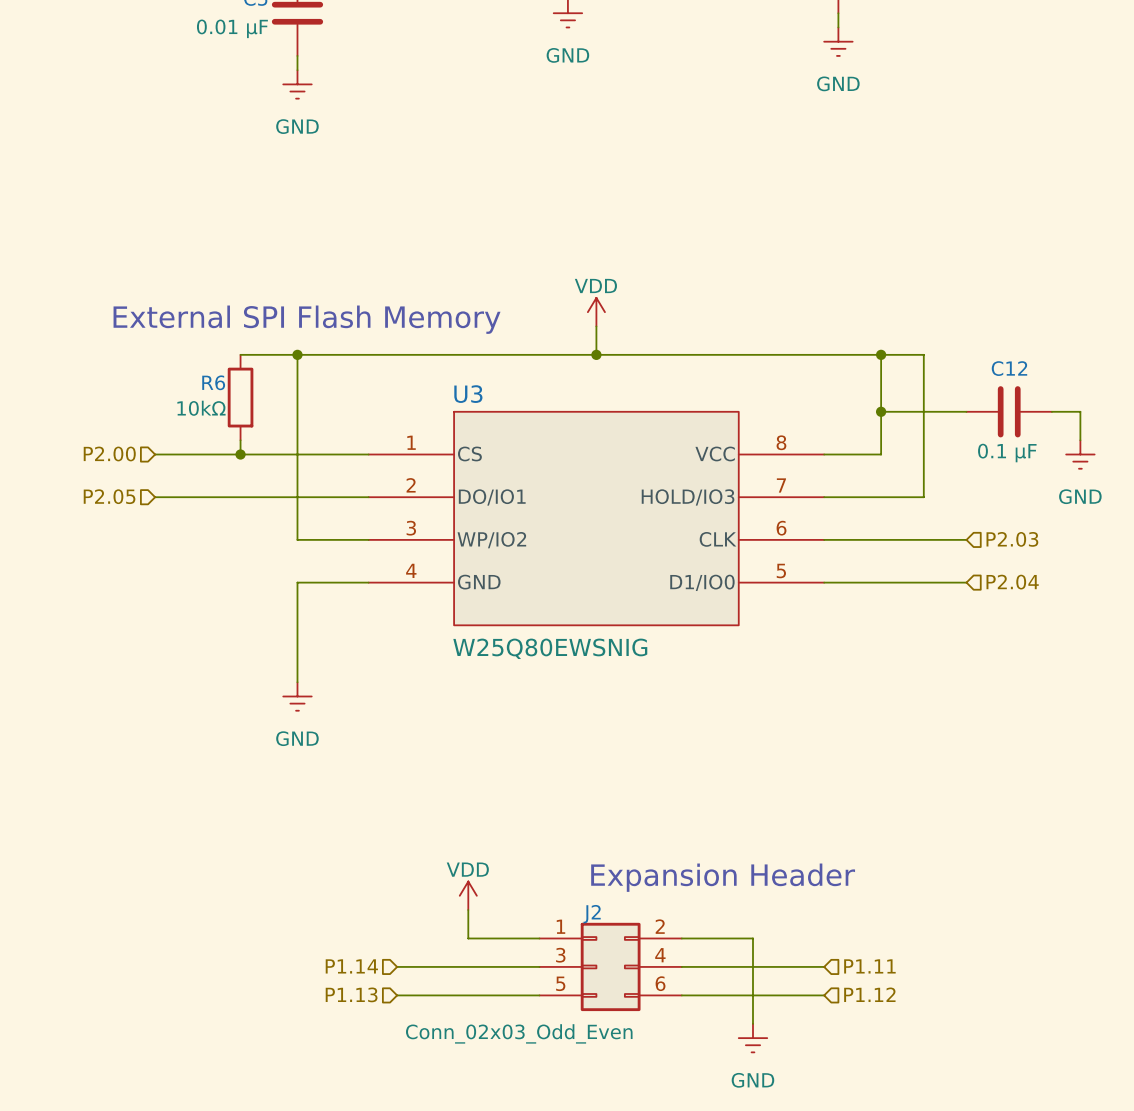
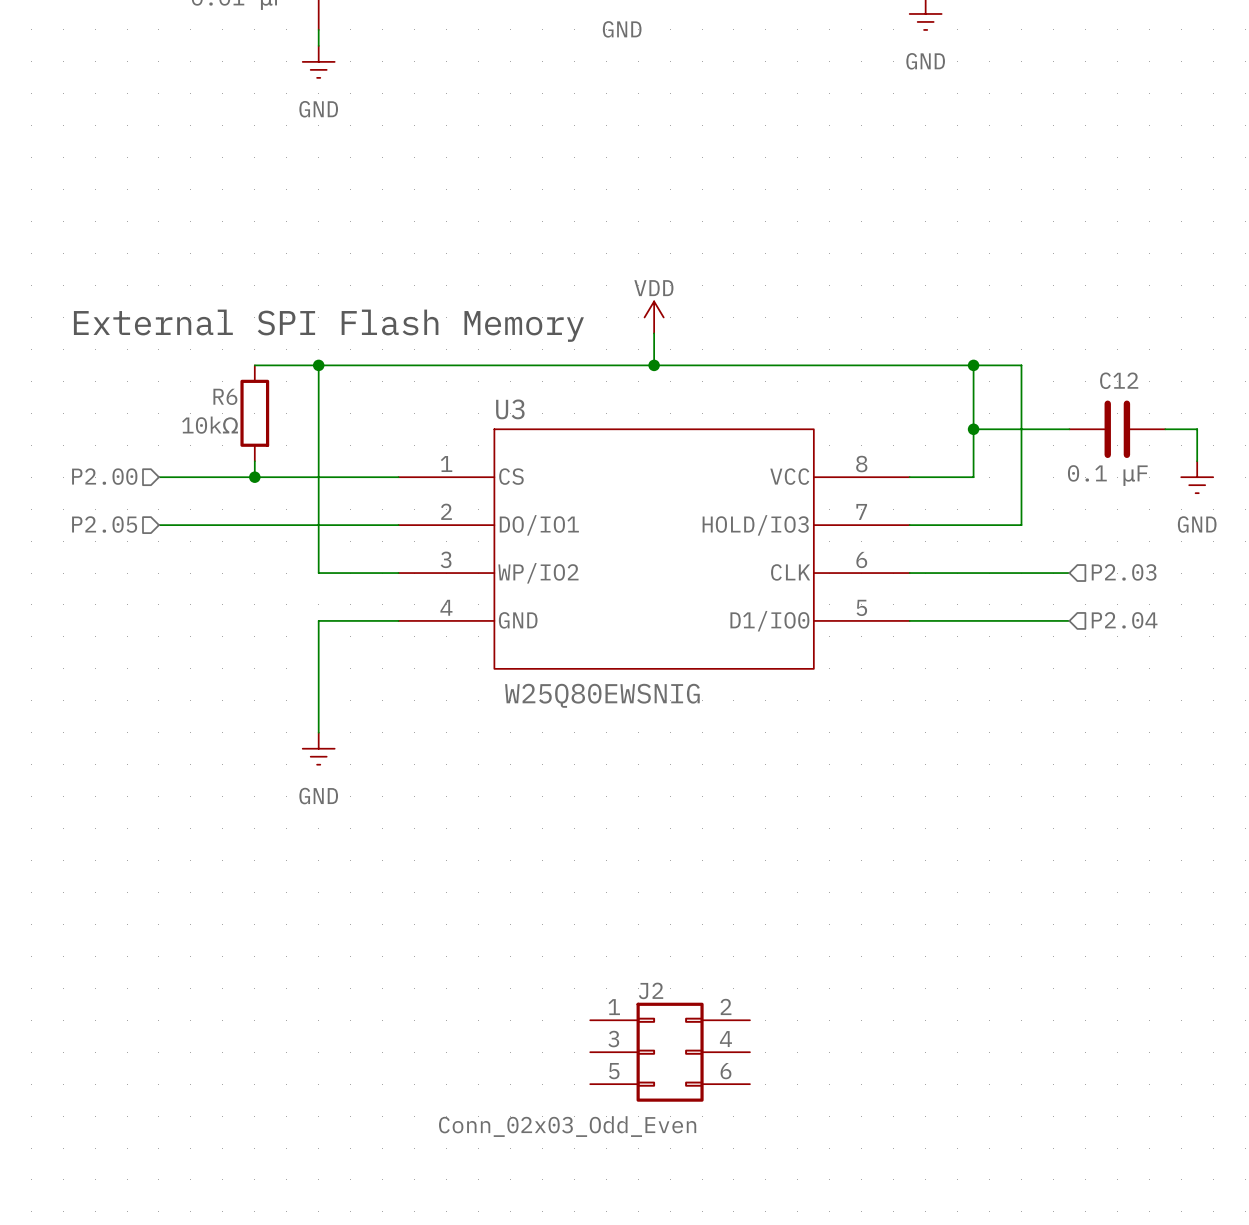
text: Expansion Header (723, 877) -> none
power symbol: VDD (468, 895) -> none
wire: (468, 910) (468, 938) (539, 938) -> none
wire: (681, 938) (752, 938) (752, 1023) -> none
hierarchical label: P1.14 (351, 966) -> none
wire: (397, 966) (539, 966) -> none
wire: (681, 966) (824, 966) -> none
hierarchical label: P1.11 (869, 966) -> none
hierarchical label: P1.13 (351, 994) -> none
hierarchical label: P1.12 (869, 994) -> none
wire: (397, 995) (539, 995) -> none
wire: (681, 995) (824, 995) -> none
power symbol: GND (752, 1038) -> none

